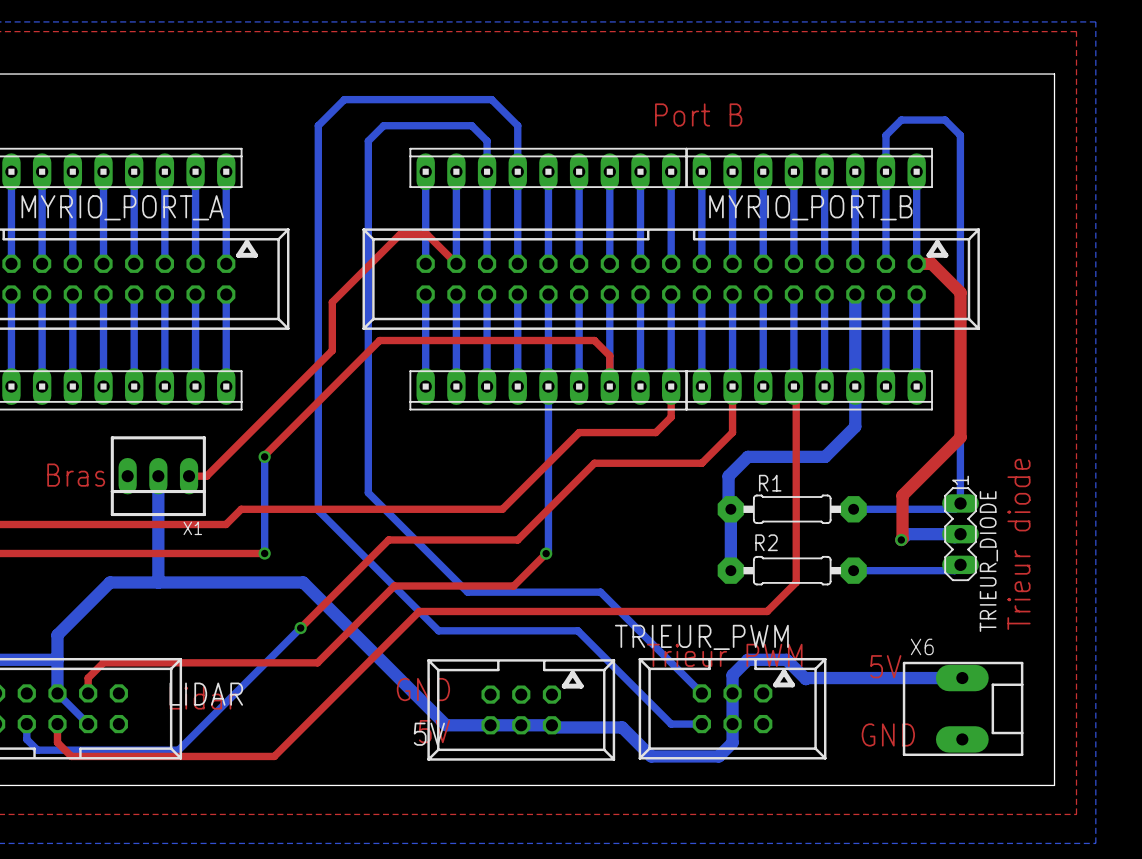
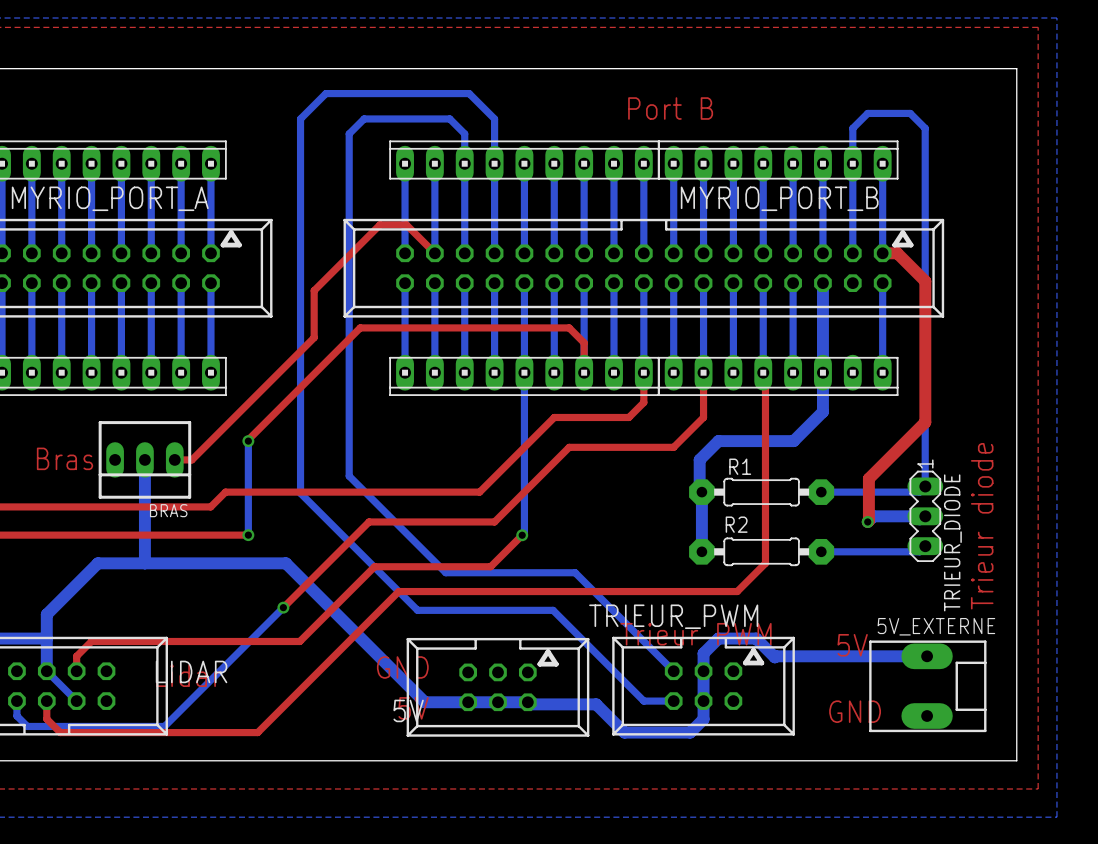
bottom track: (885, 294) (885, 386) -> none
X1 name: X1 (192, 528) -> BRAS (168, 510)
X6 name: X6 (922, 646) -> 5V_EXTERNE (936, 626)

